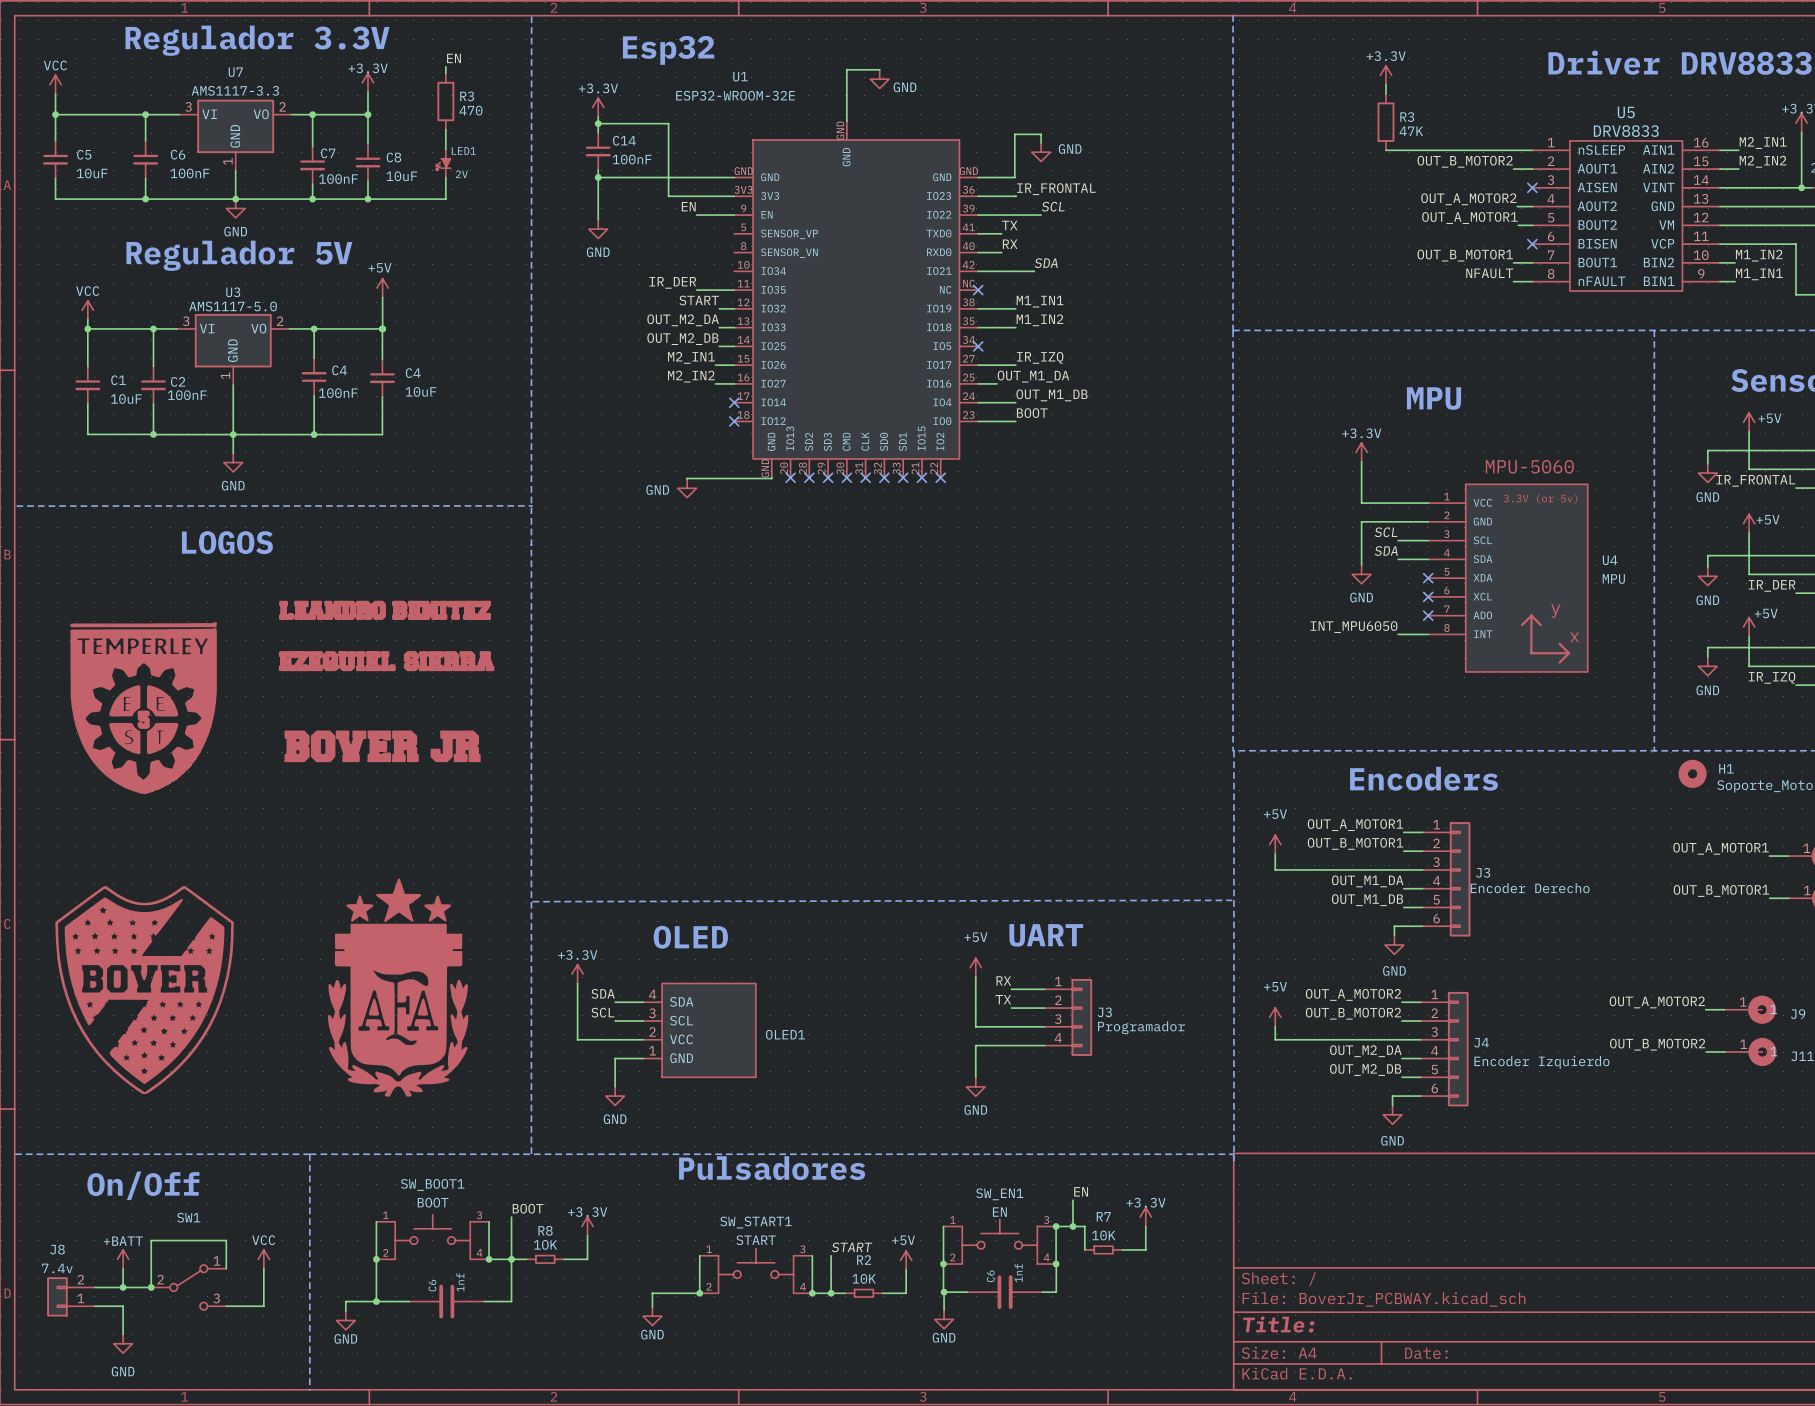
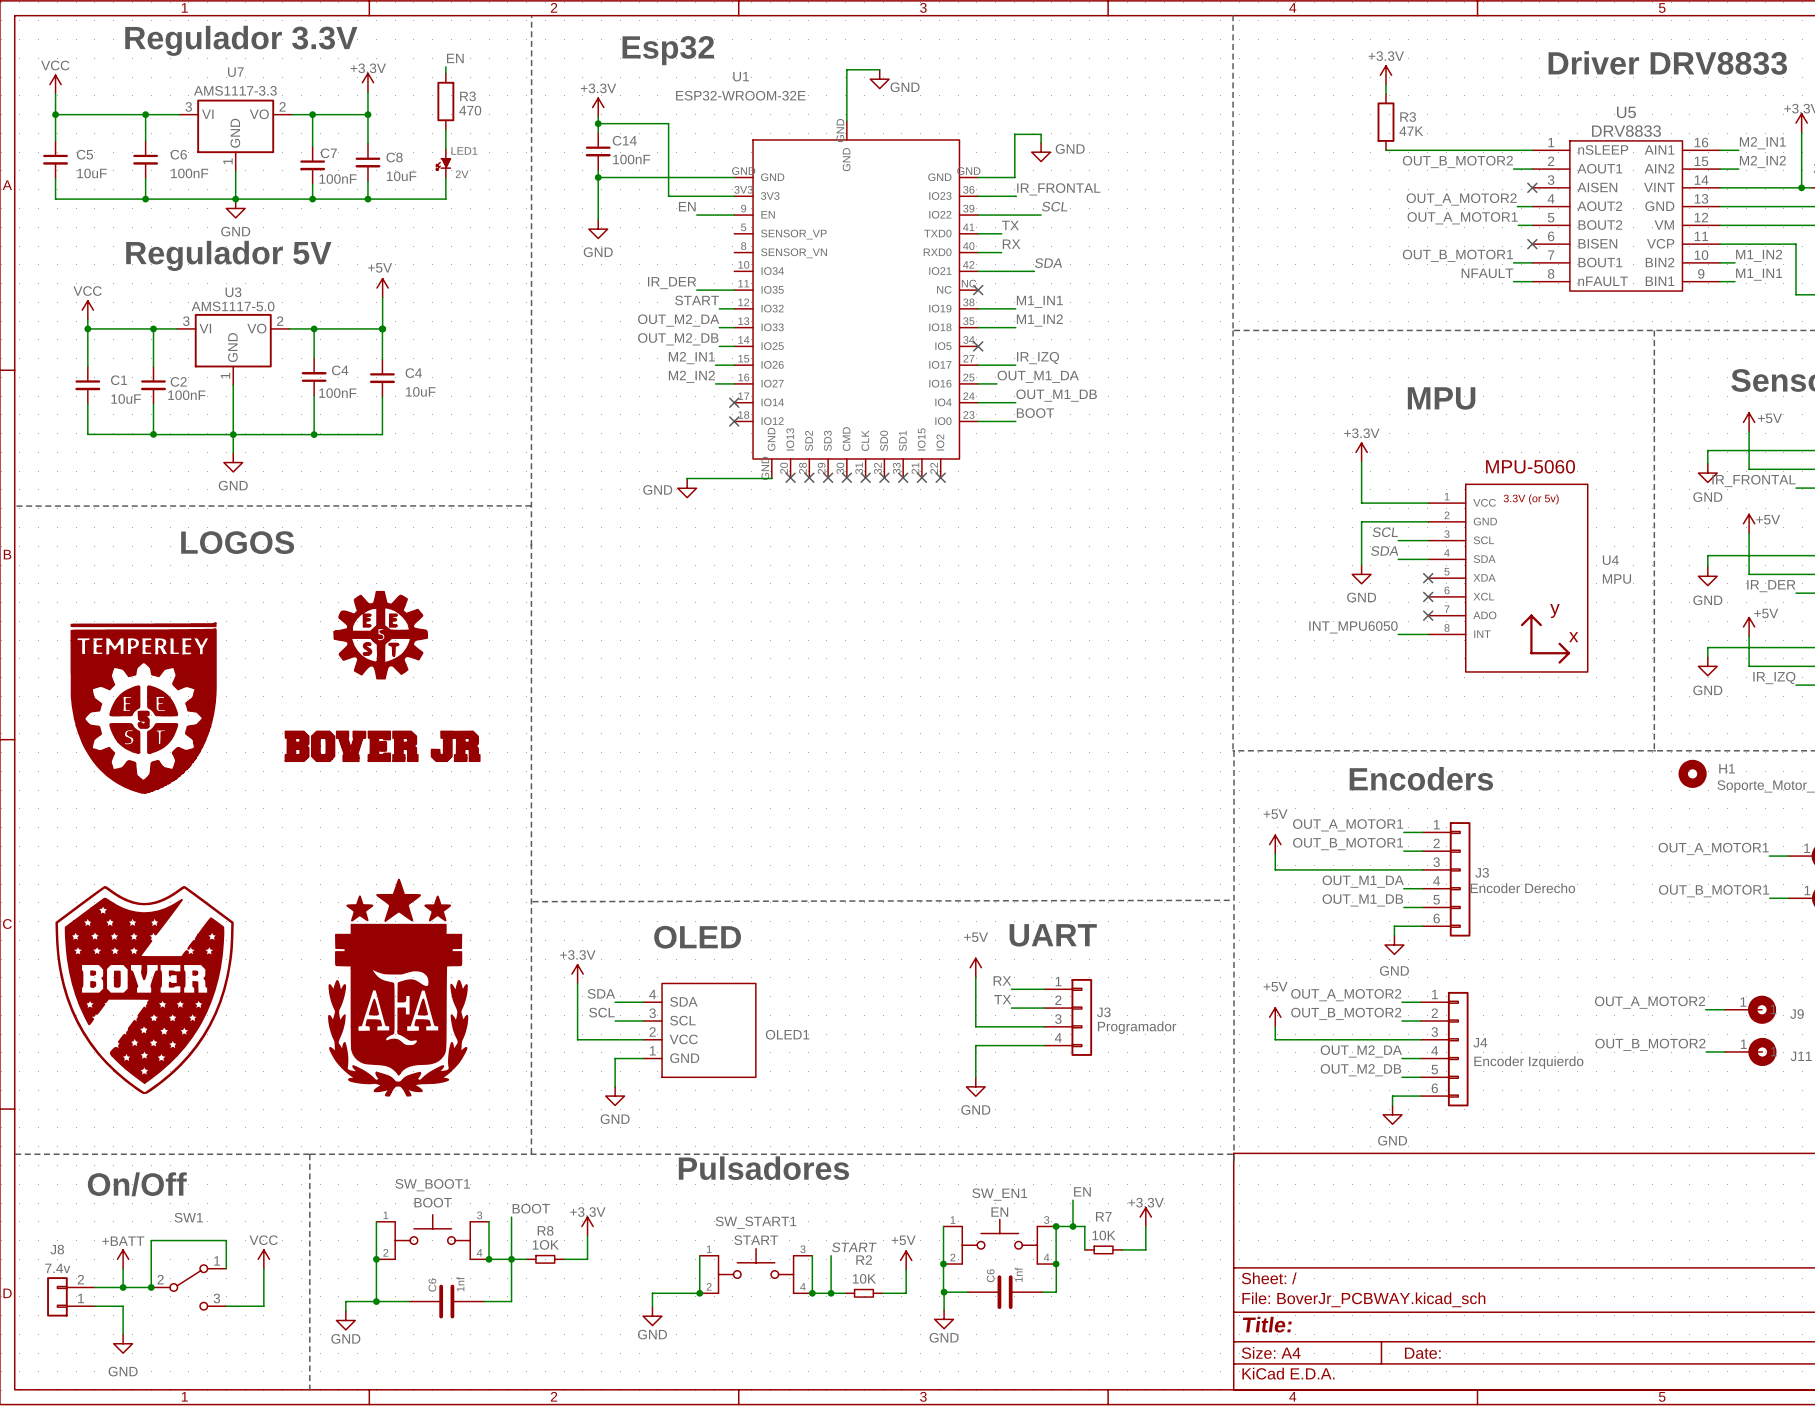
part: (385, 610) -> none
part: none -> (380, 635)
part: (386, 661) -> none

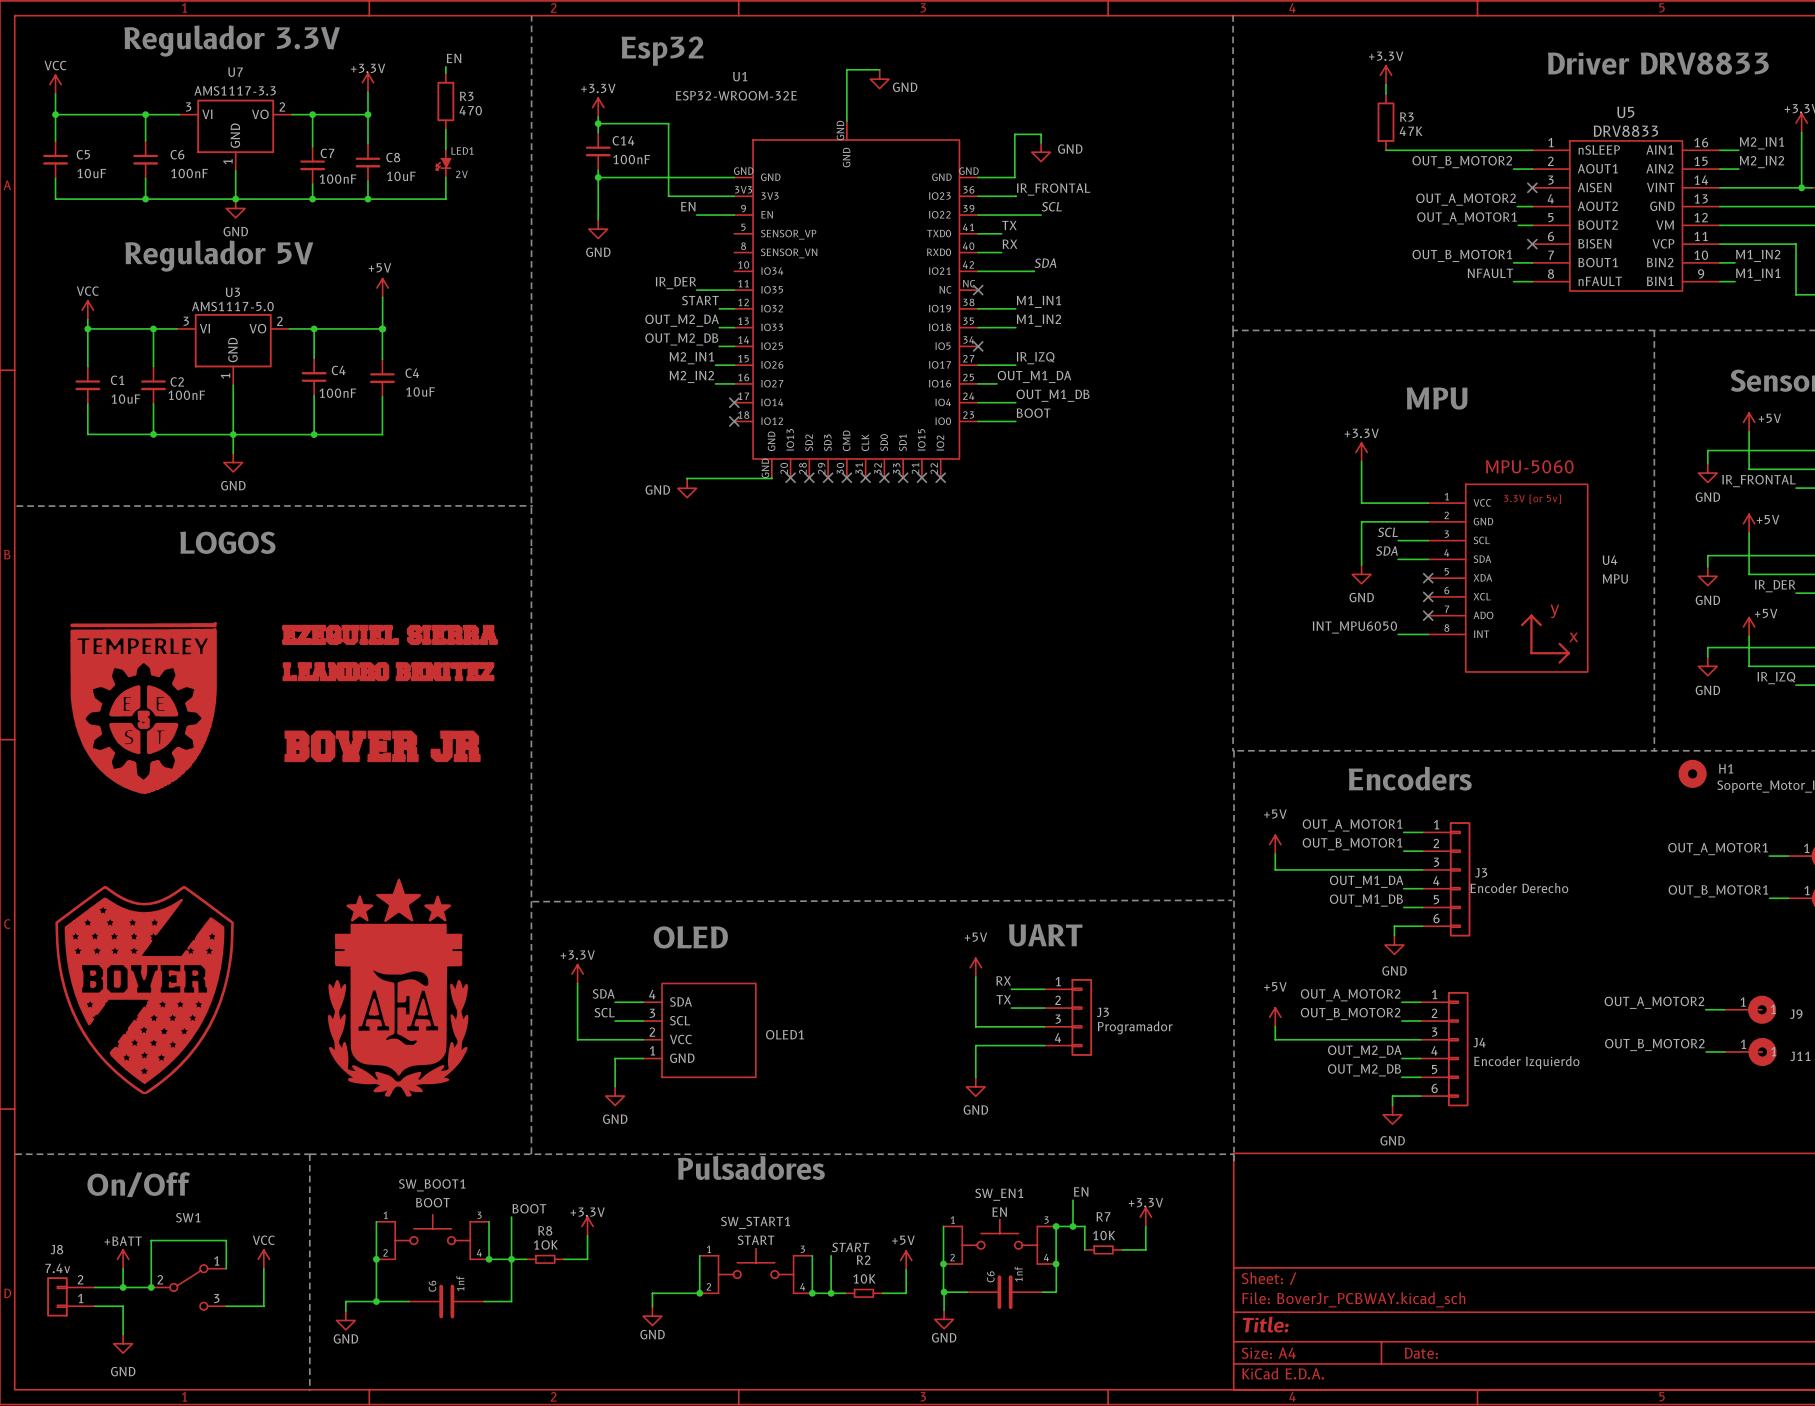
part: none -> (389, 634)
part: (380, 635) -> none
part: none -> (388, 671)

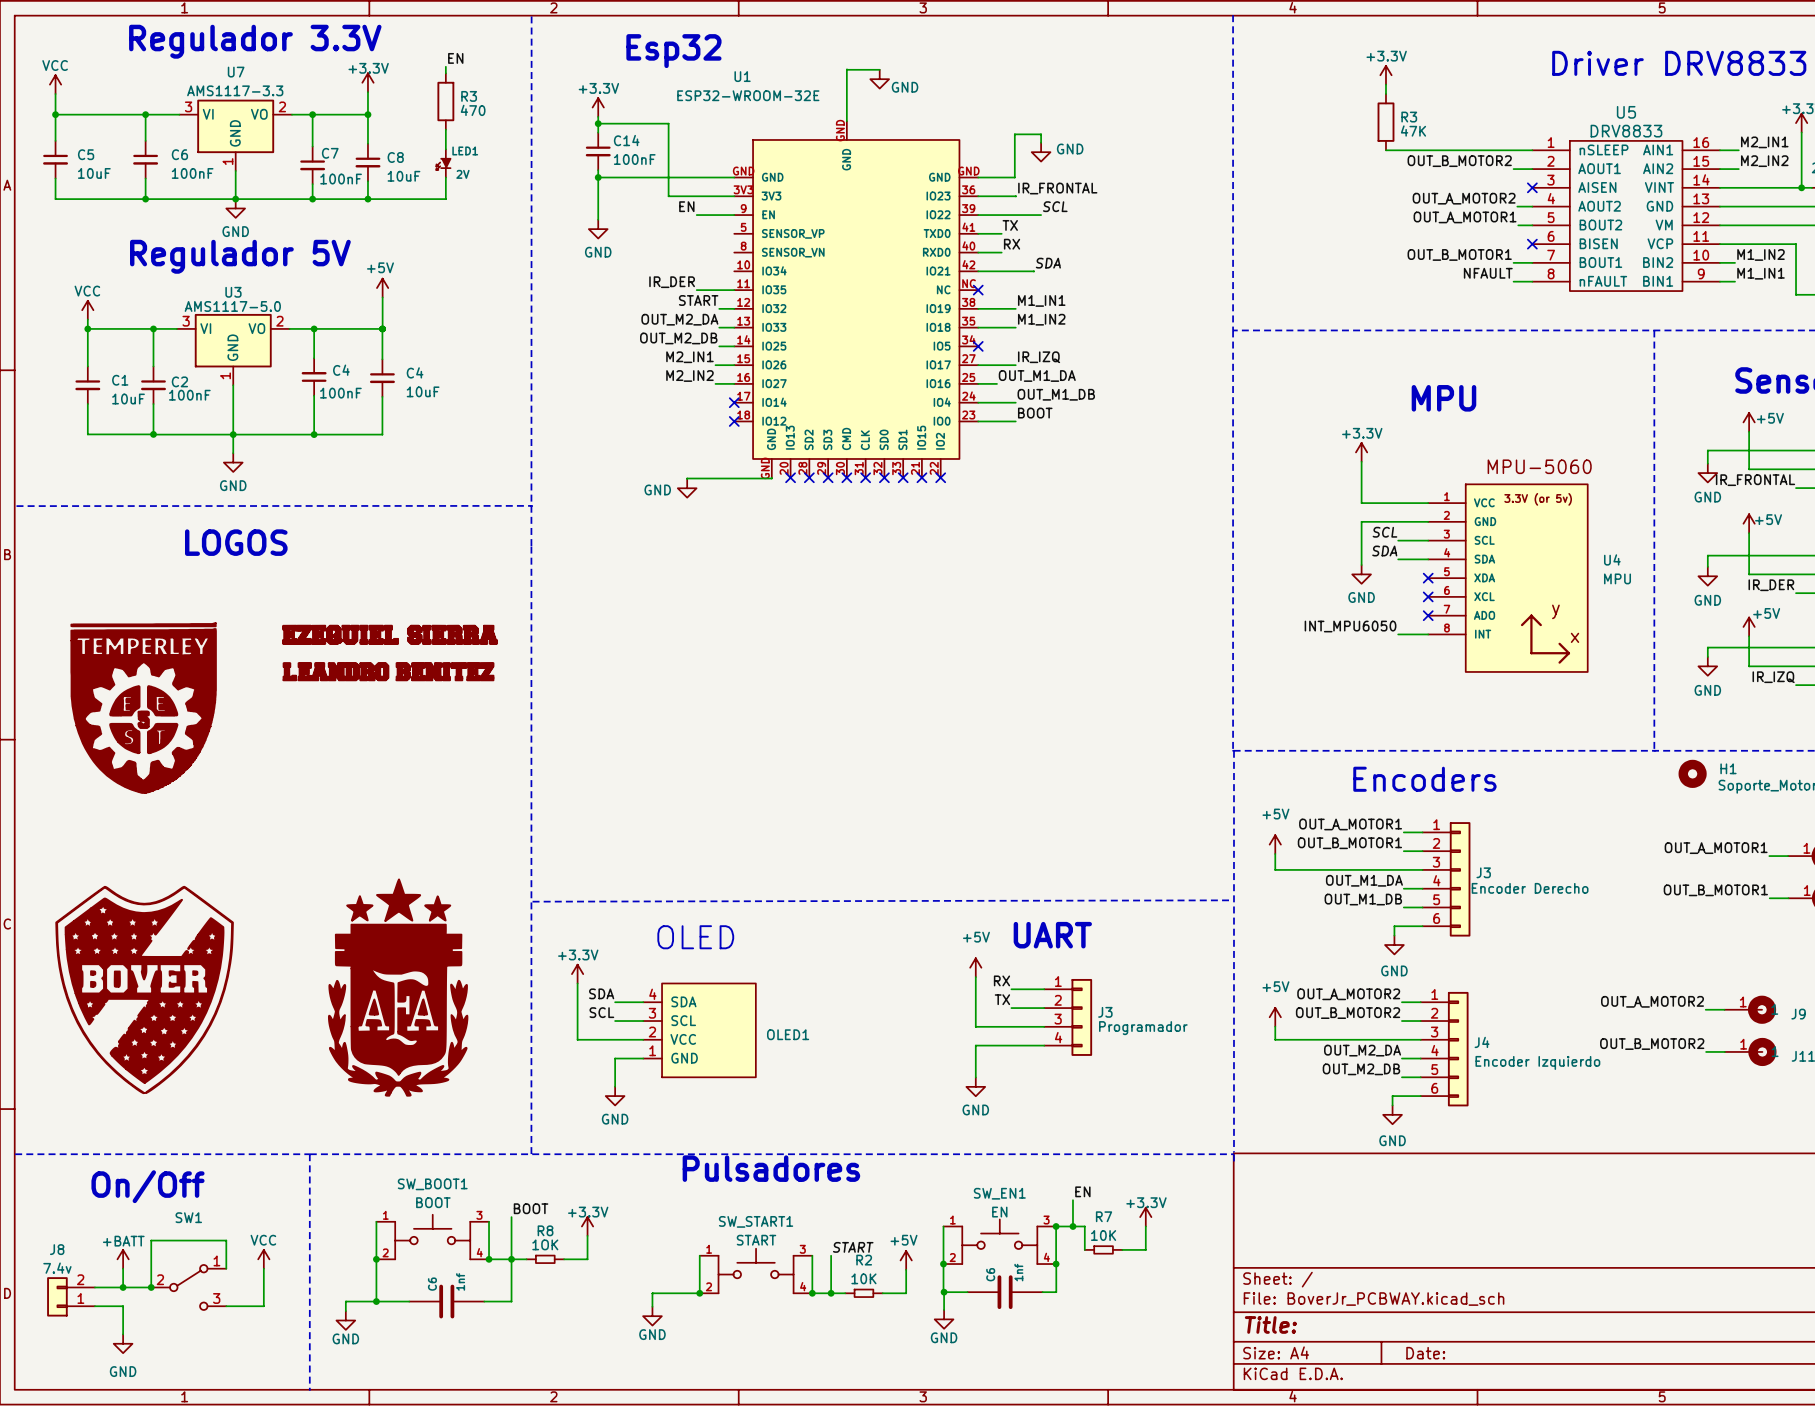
part: (382, 746) -> none

